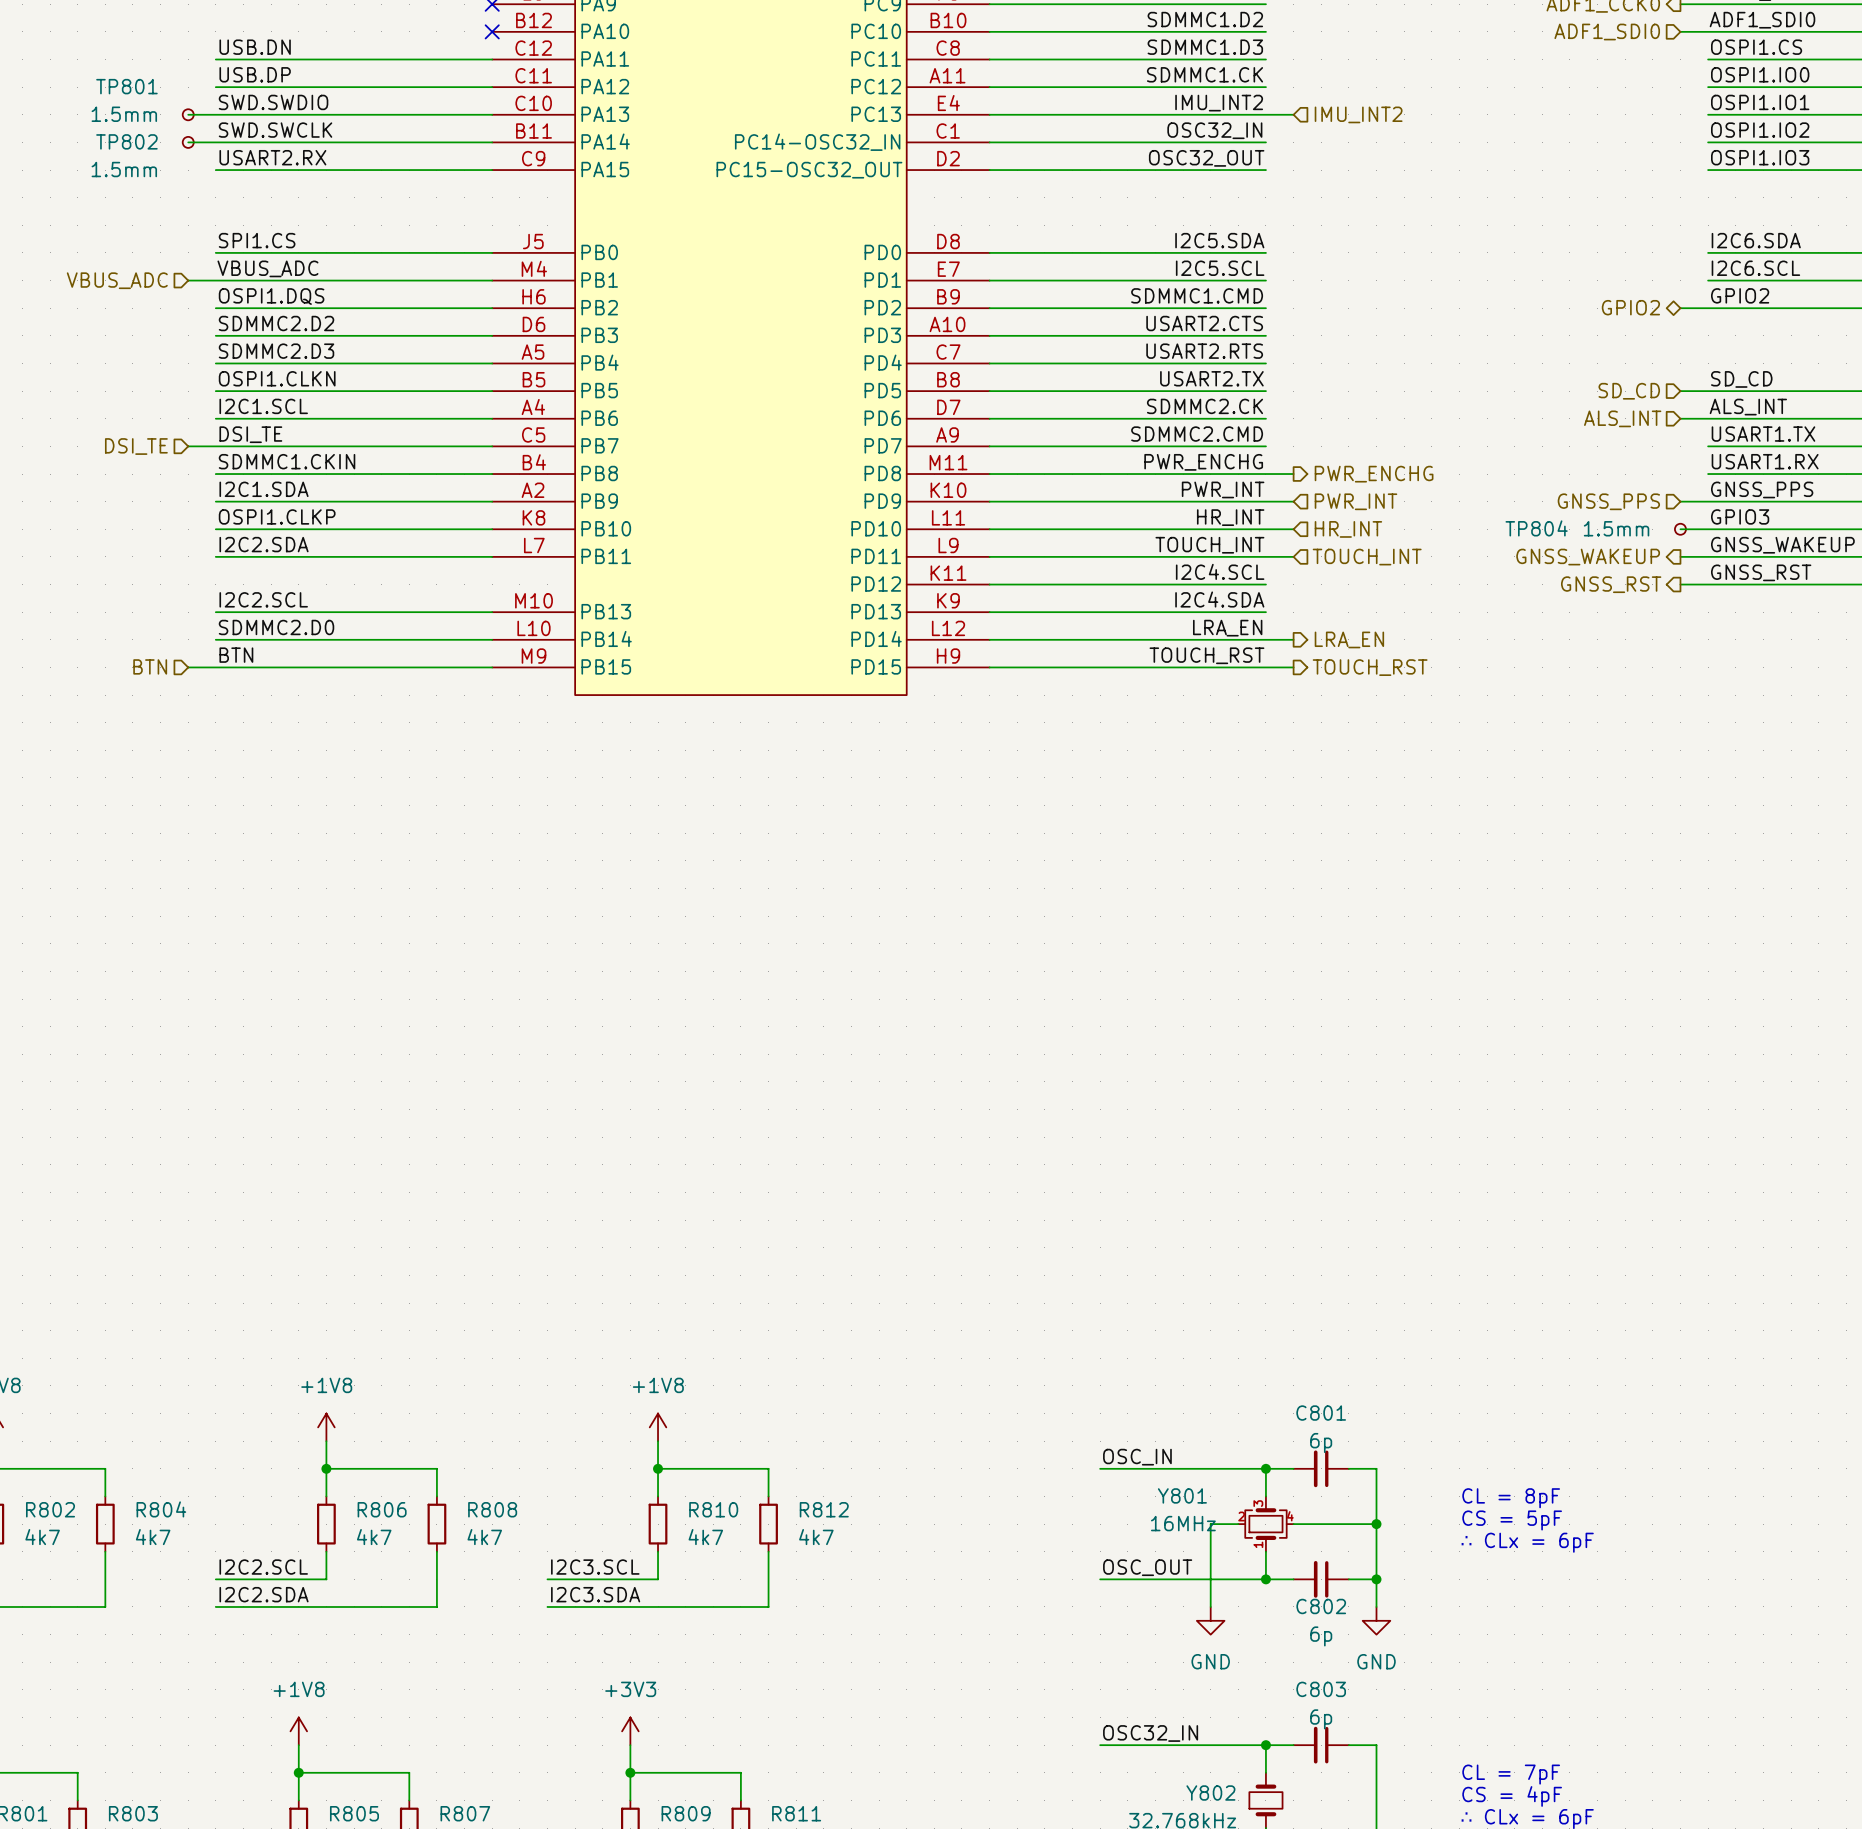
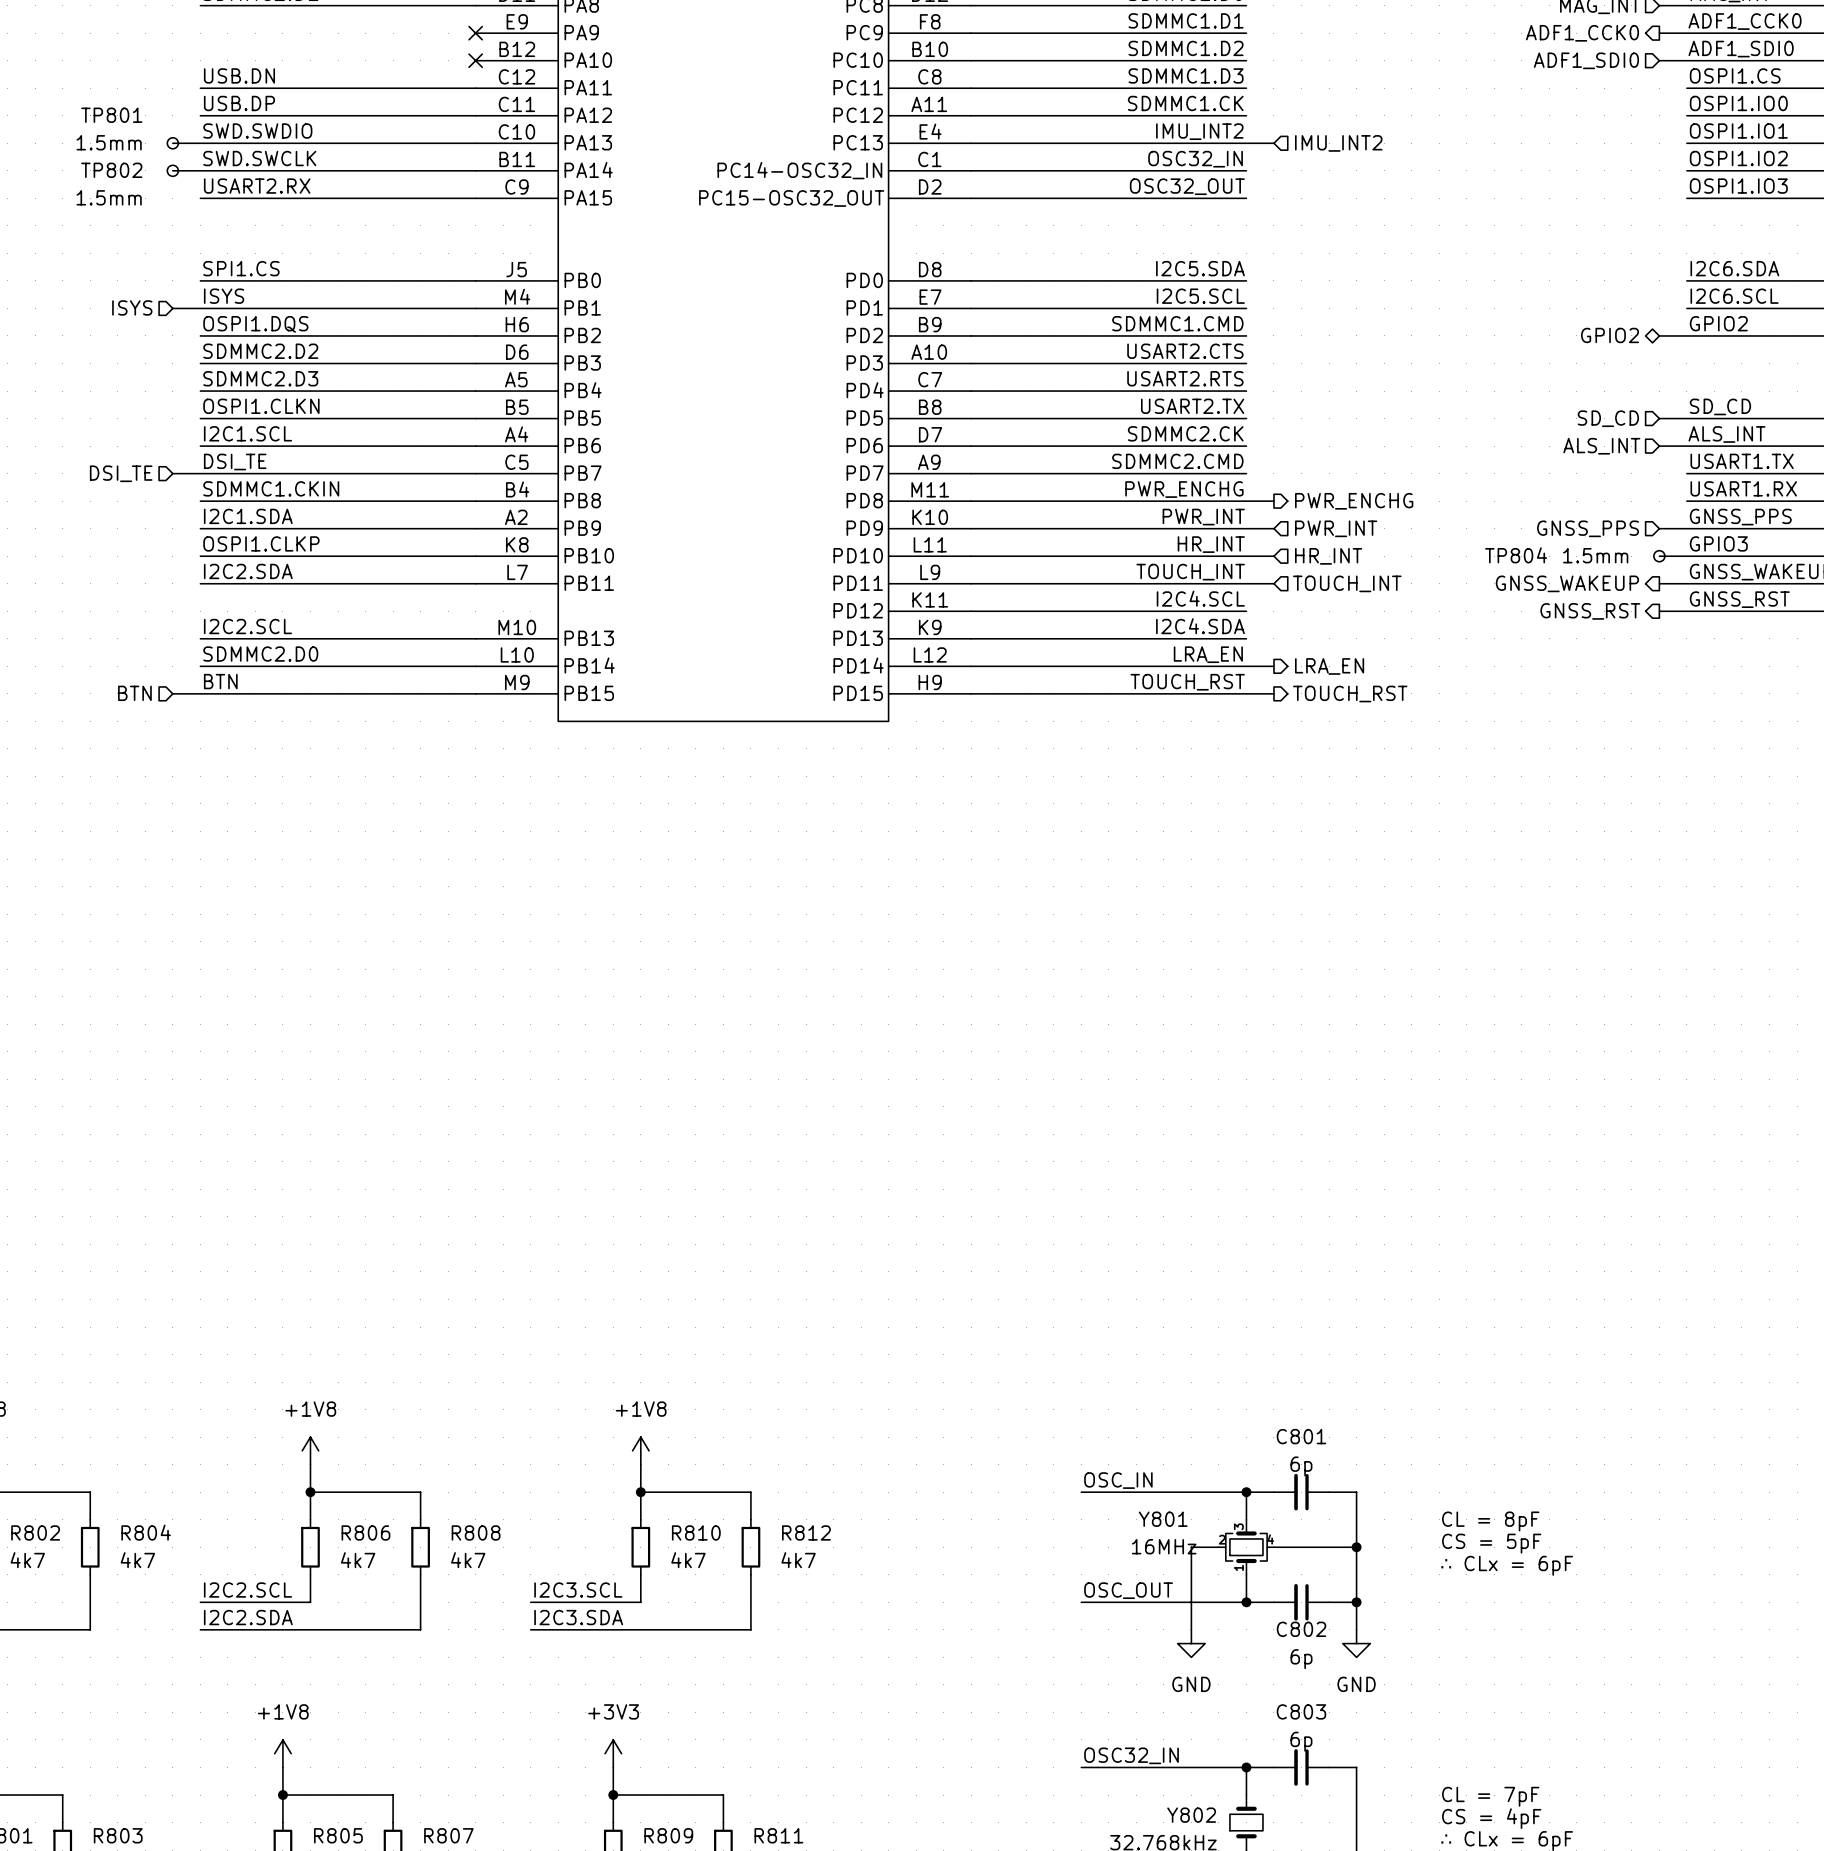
label: VBUS_ADC (267, 268) -> ISYS (224, 296)
hierarchical label: VBUS_ADC (117, 280) -> ISYS (132, 307)

